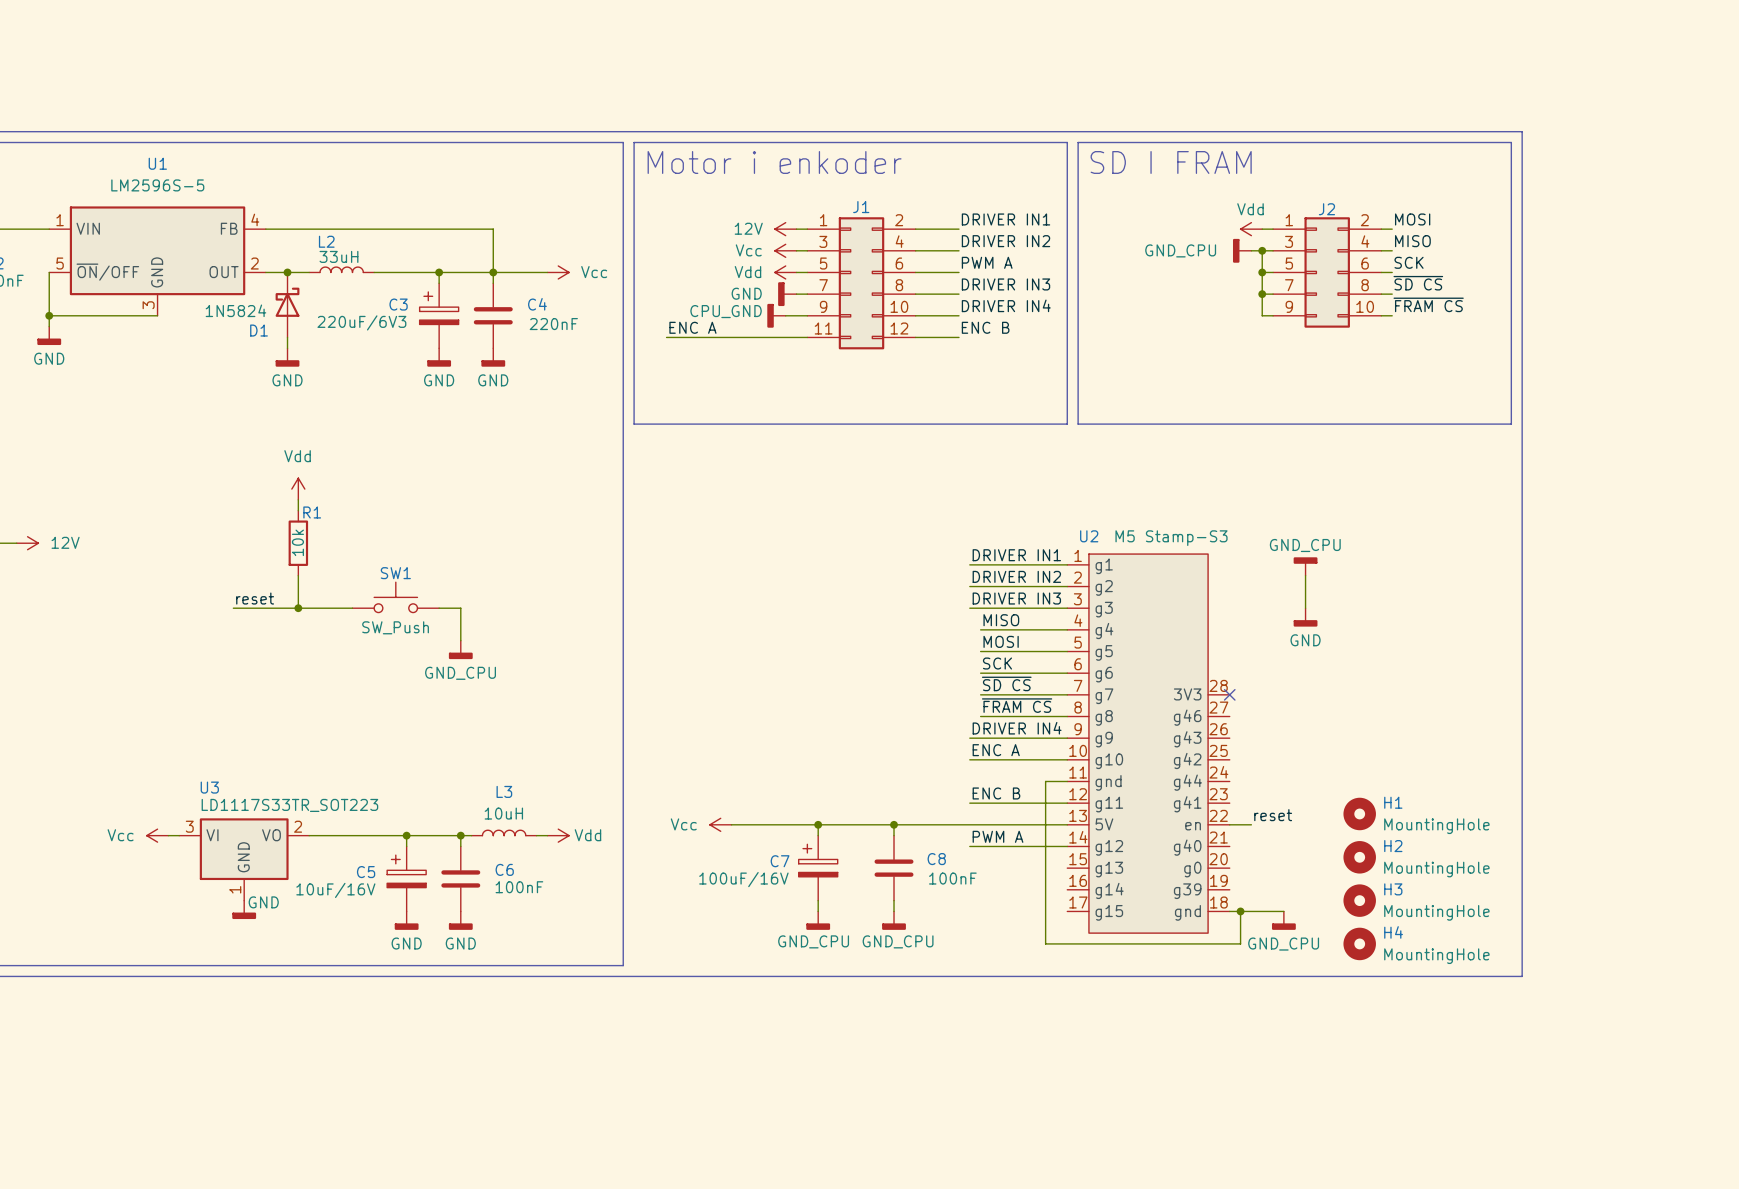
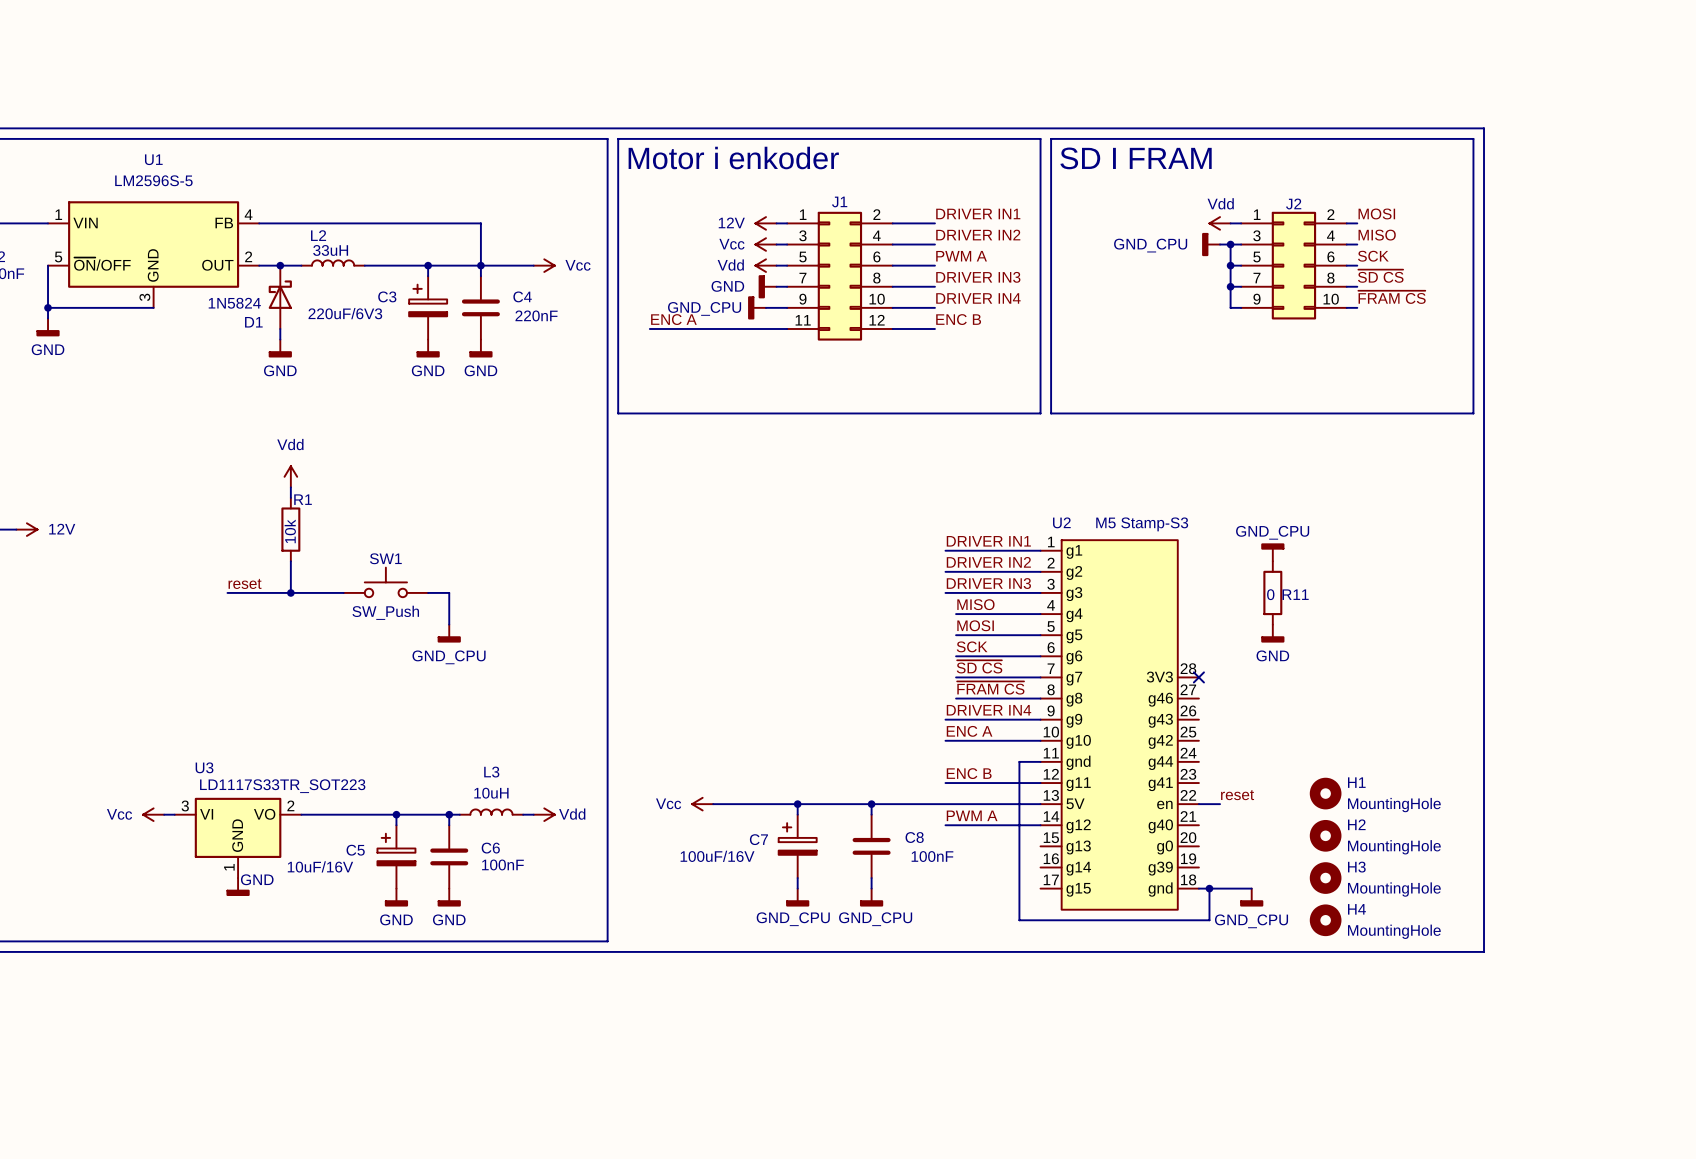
power symbol: CPU_GND (776, 315) -> GND_CPU (757, 307)
wire: (1305, 575) (1305, 608) -> none
R11: none -> 0 (1272, 592)
power symbol position: GND (1305, 617) -> GND (1272, 633)

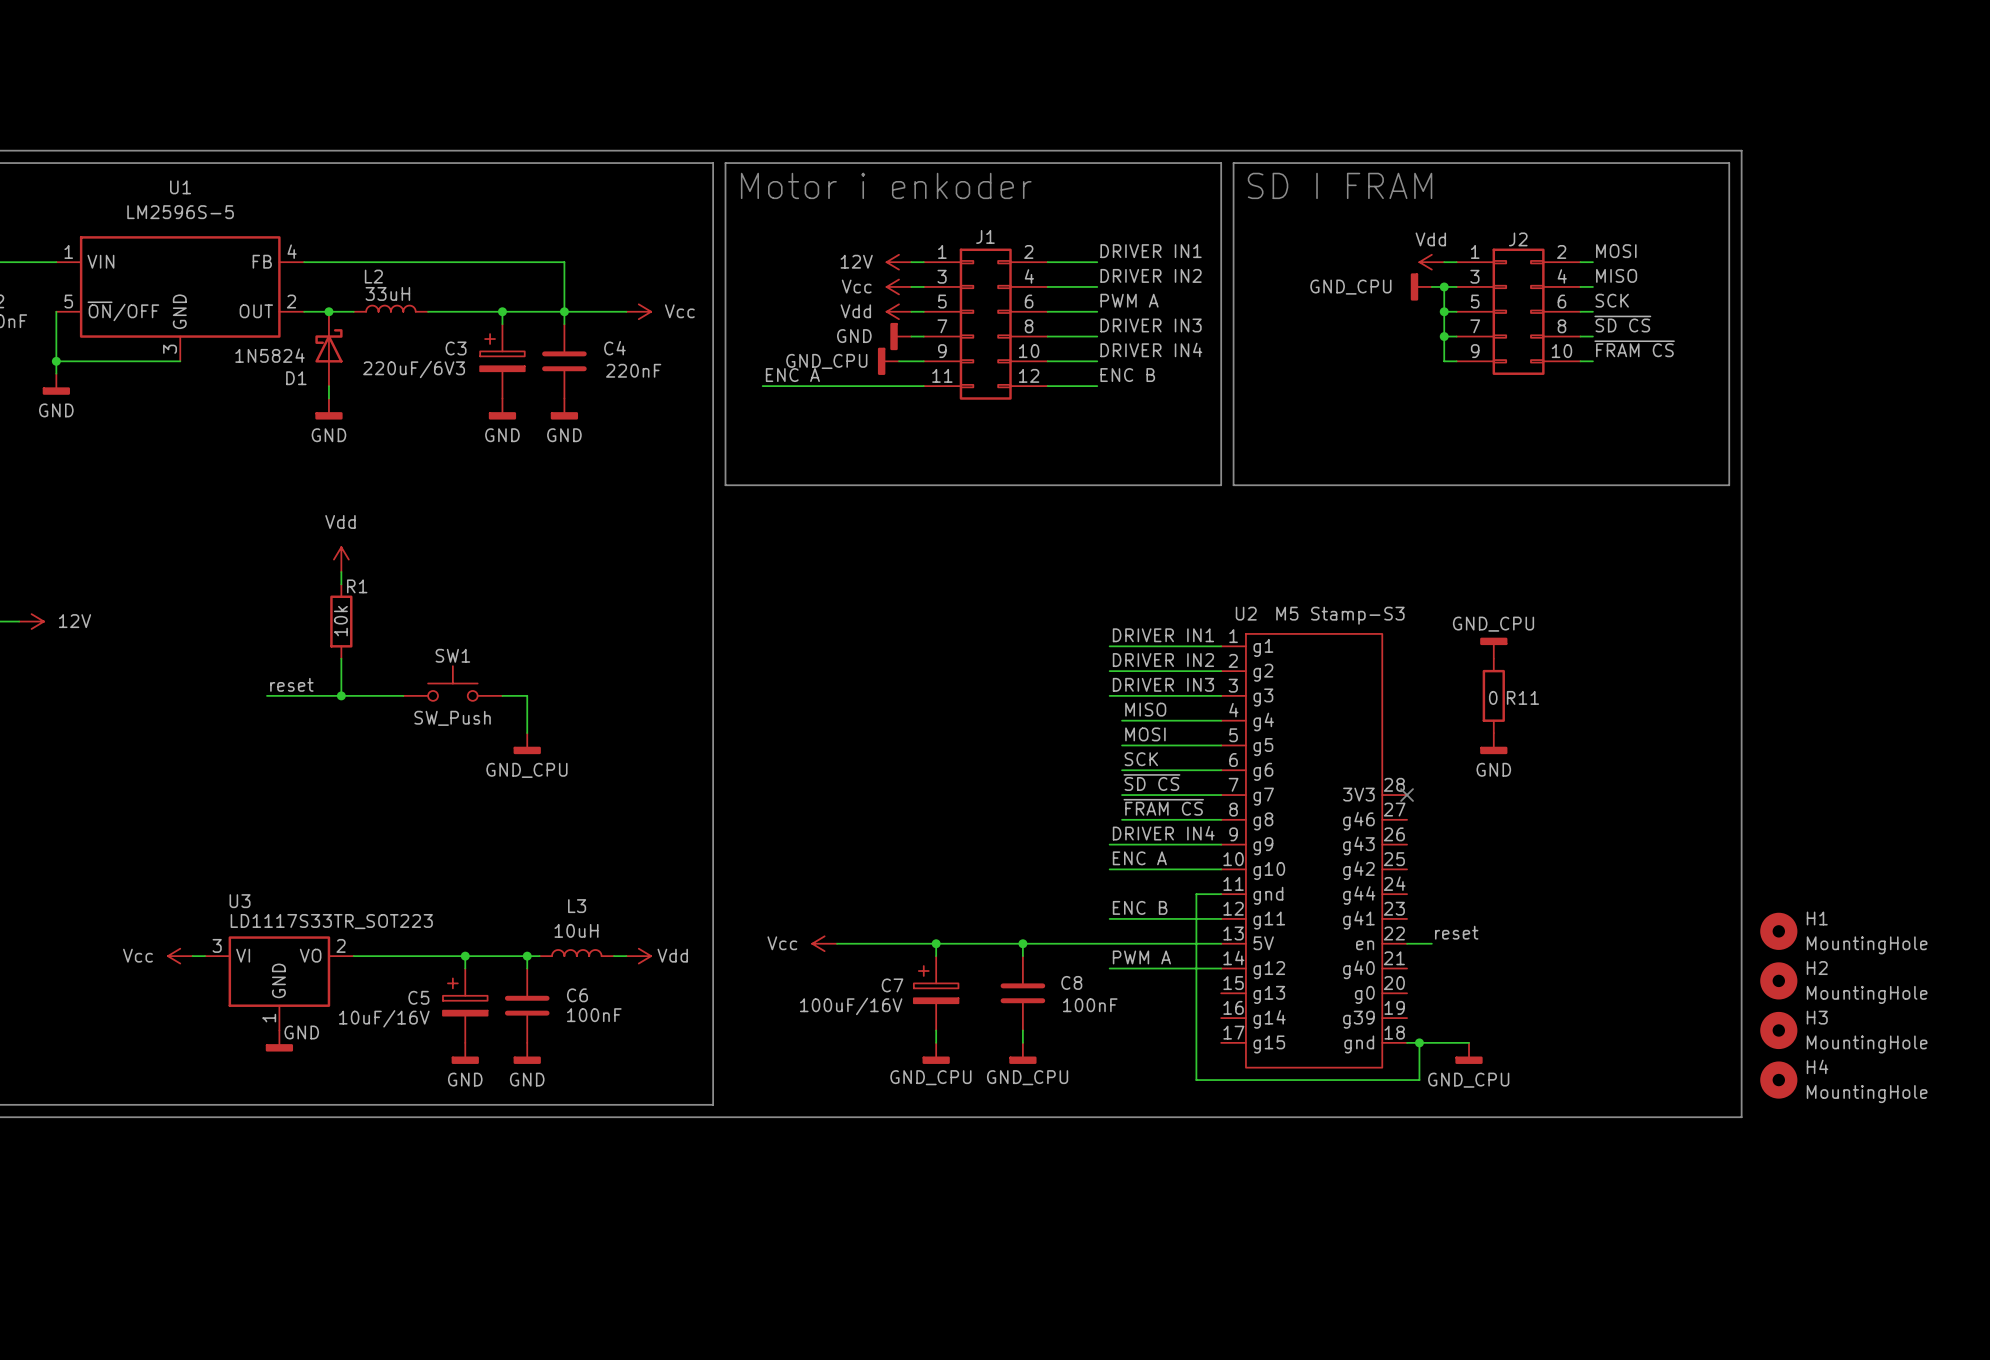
H1 position: (1325, 793) -> (1778, 931)
H2 position: (1325, 835) -> (1778, 980)
H3 position: (1325, 878) -> (1778, 1030)
H4 position: (1325, 920) -> (1778, 1080)

